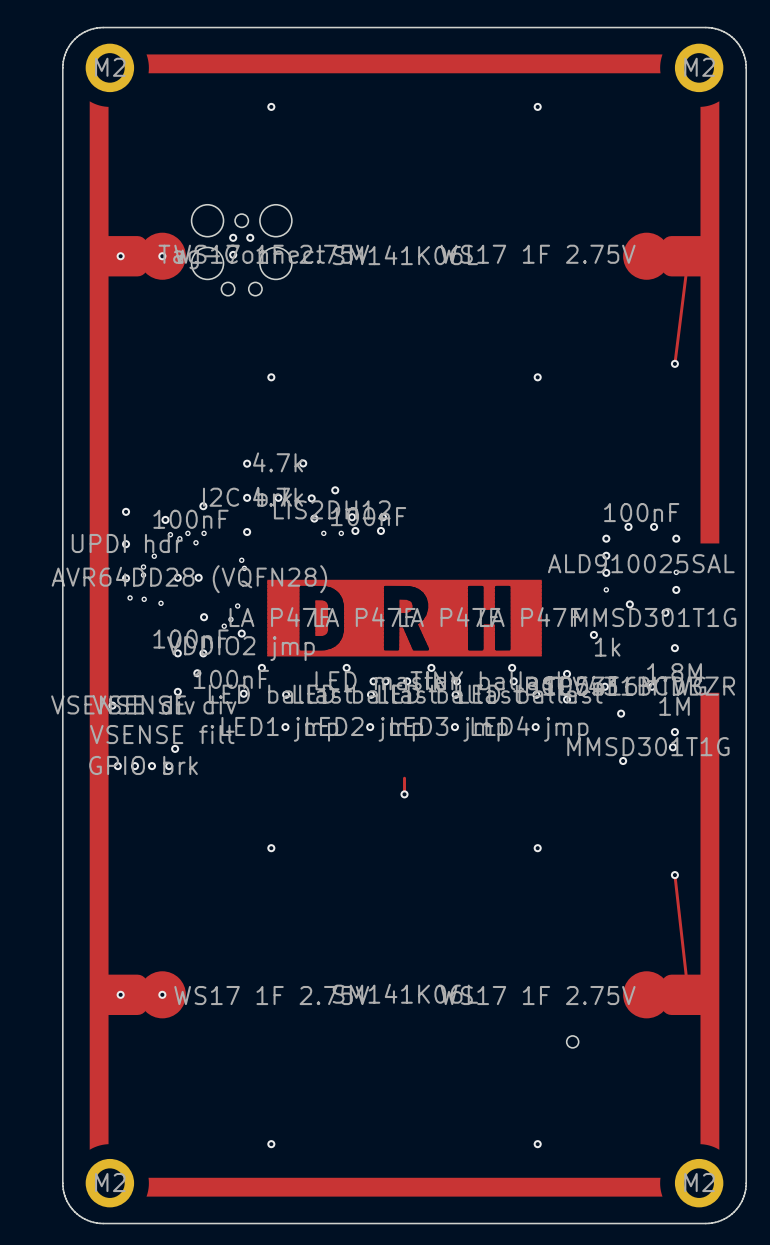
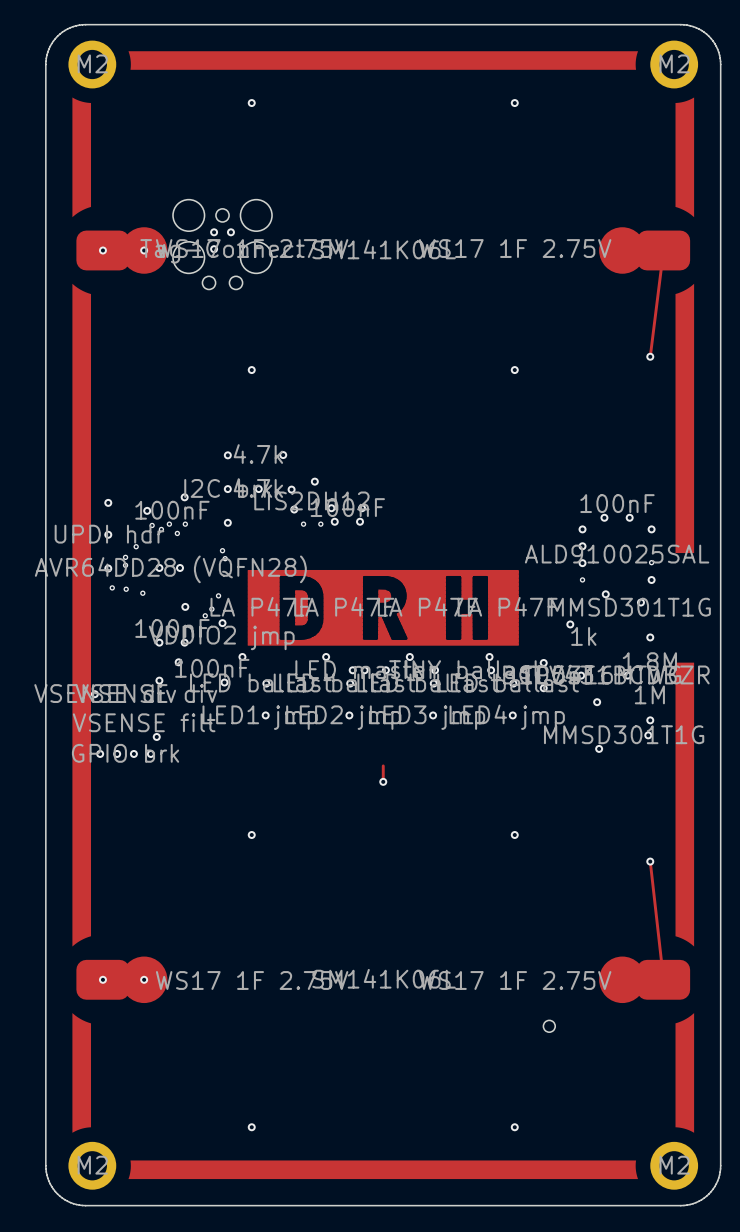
drawing shape: [89, 101, 109, 1150] -> [72, 283, 92, 947]
drawing: none -> [72, 97, 92, 218]
drawing: [700, 101, 720, 544] -> none
drawing: none -> [675, 97, 695, 218]
drawing: none -> [675, 283, 695, 554]
drawing: none -> [675, 662, 695, 947]
drawing: [700, 692, 720, 1150] -> none
drawing: none -> [72, 1013, 92, 1133]
drawing: none -> [675, 1013, 695, 1133]

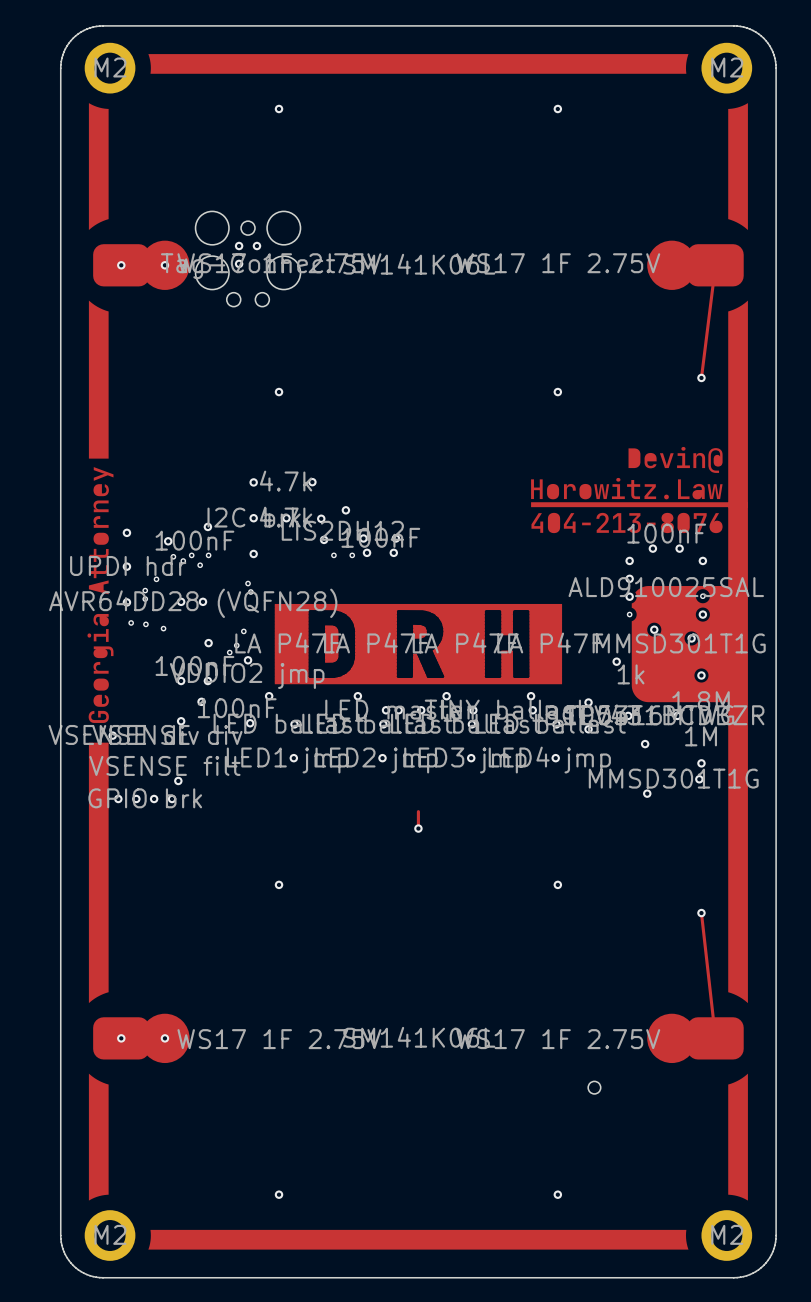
drawing shape: [72, 283, 92, 947] -> [93, 646, 114, 659]
drawing: none -> [88, 300, 114, 595]
drawing: none -> [531, 446, 748, 534]
drawing: none -> [631, 586, 748, 703]
drawing: none -> [87, 613, 109, 642]
drawing: none -> [88, 661, 109, 723]
drawing: none -> [88, 742, 109, 1004]

